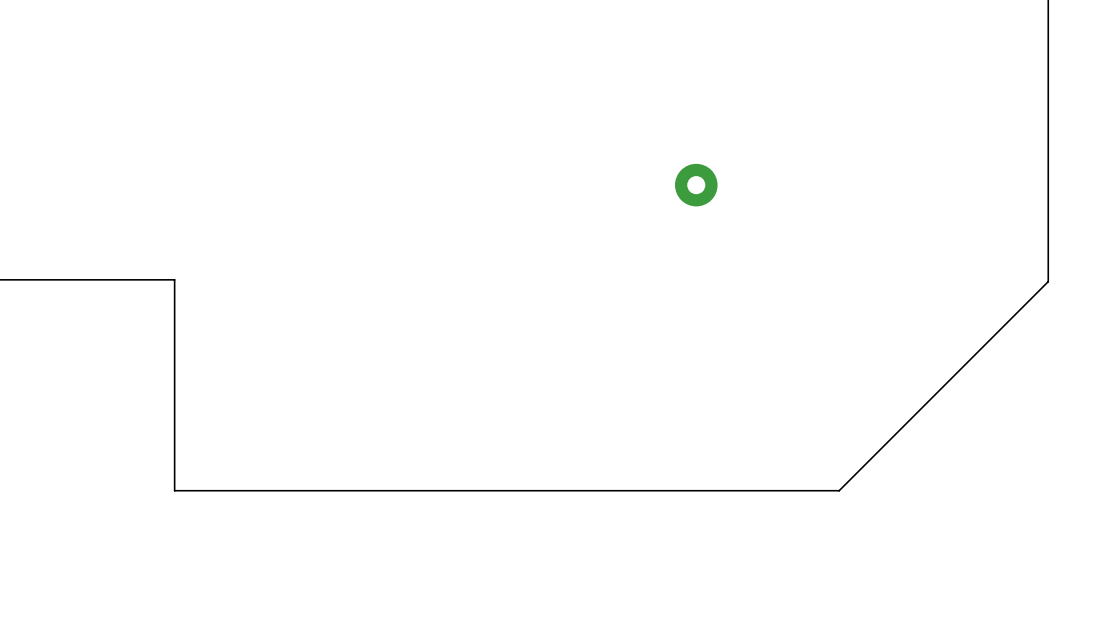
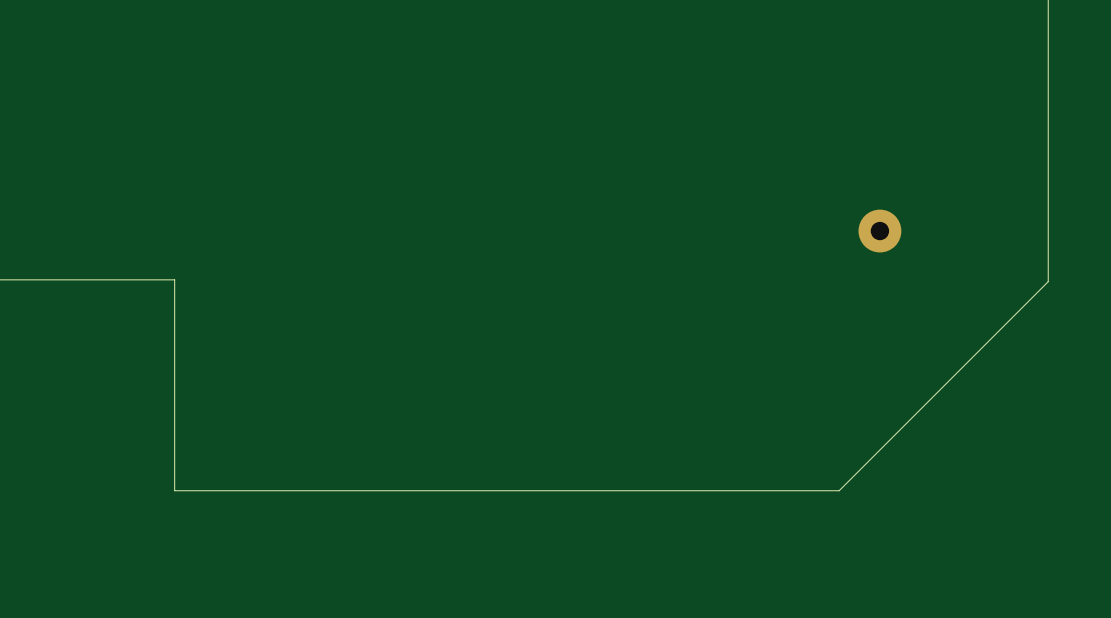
via: (696, 185) -> none
via: none -> (879, 231)

